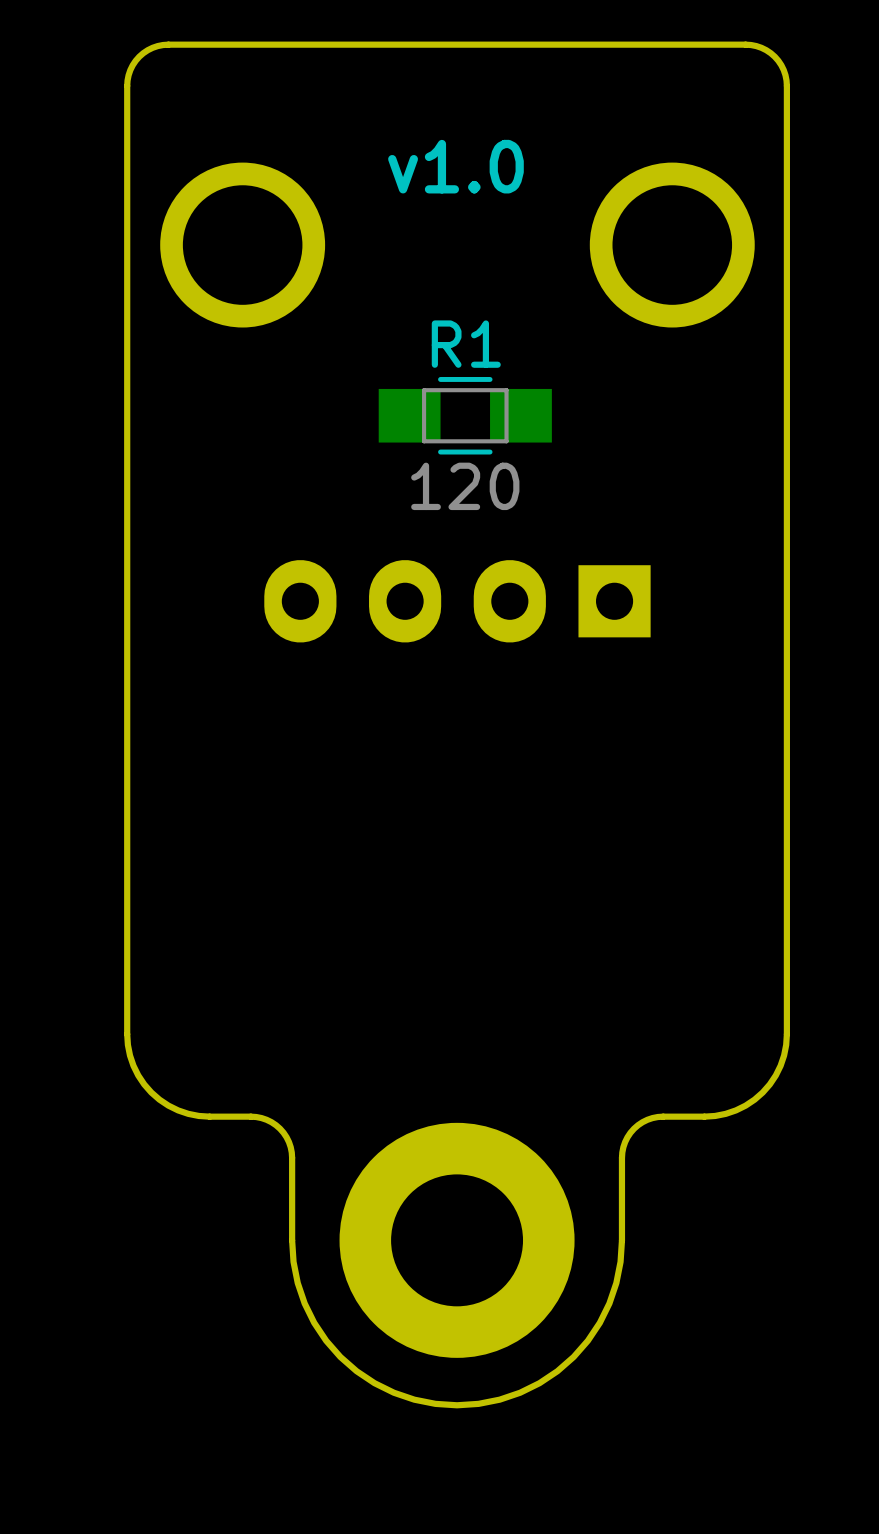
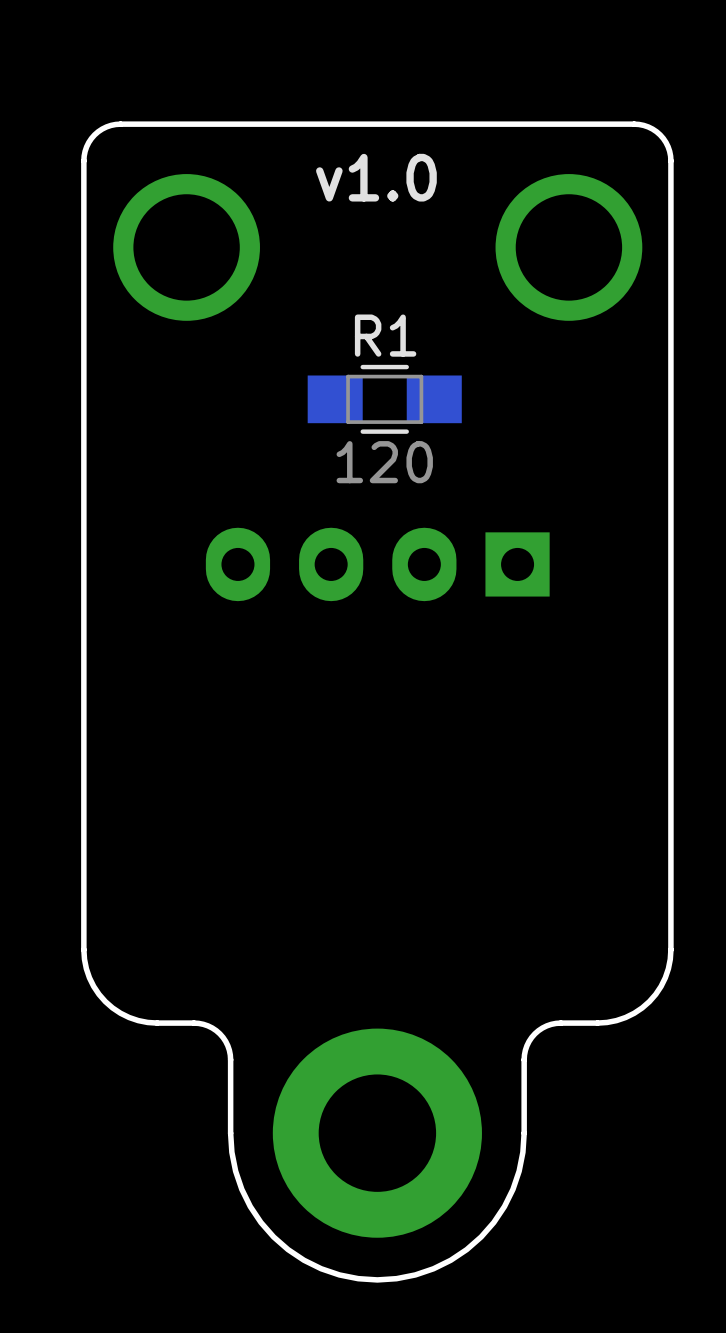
board edge: (786, 147) (786, 85) (783, 70) (770, 53) (761, 47) (745, 44) (163, 45) (143, 53) (130, 70) (127, 85) (127, 147) -> (670, 160) (668, 146) (660, 134) (648, 126) (634, 124) (115, 124) (102, 129) (91, 138) (85, 151) (83, 160)

